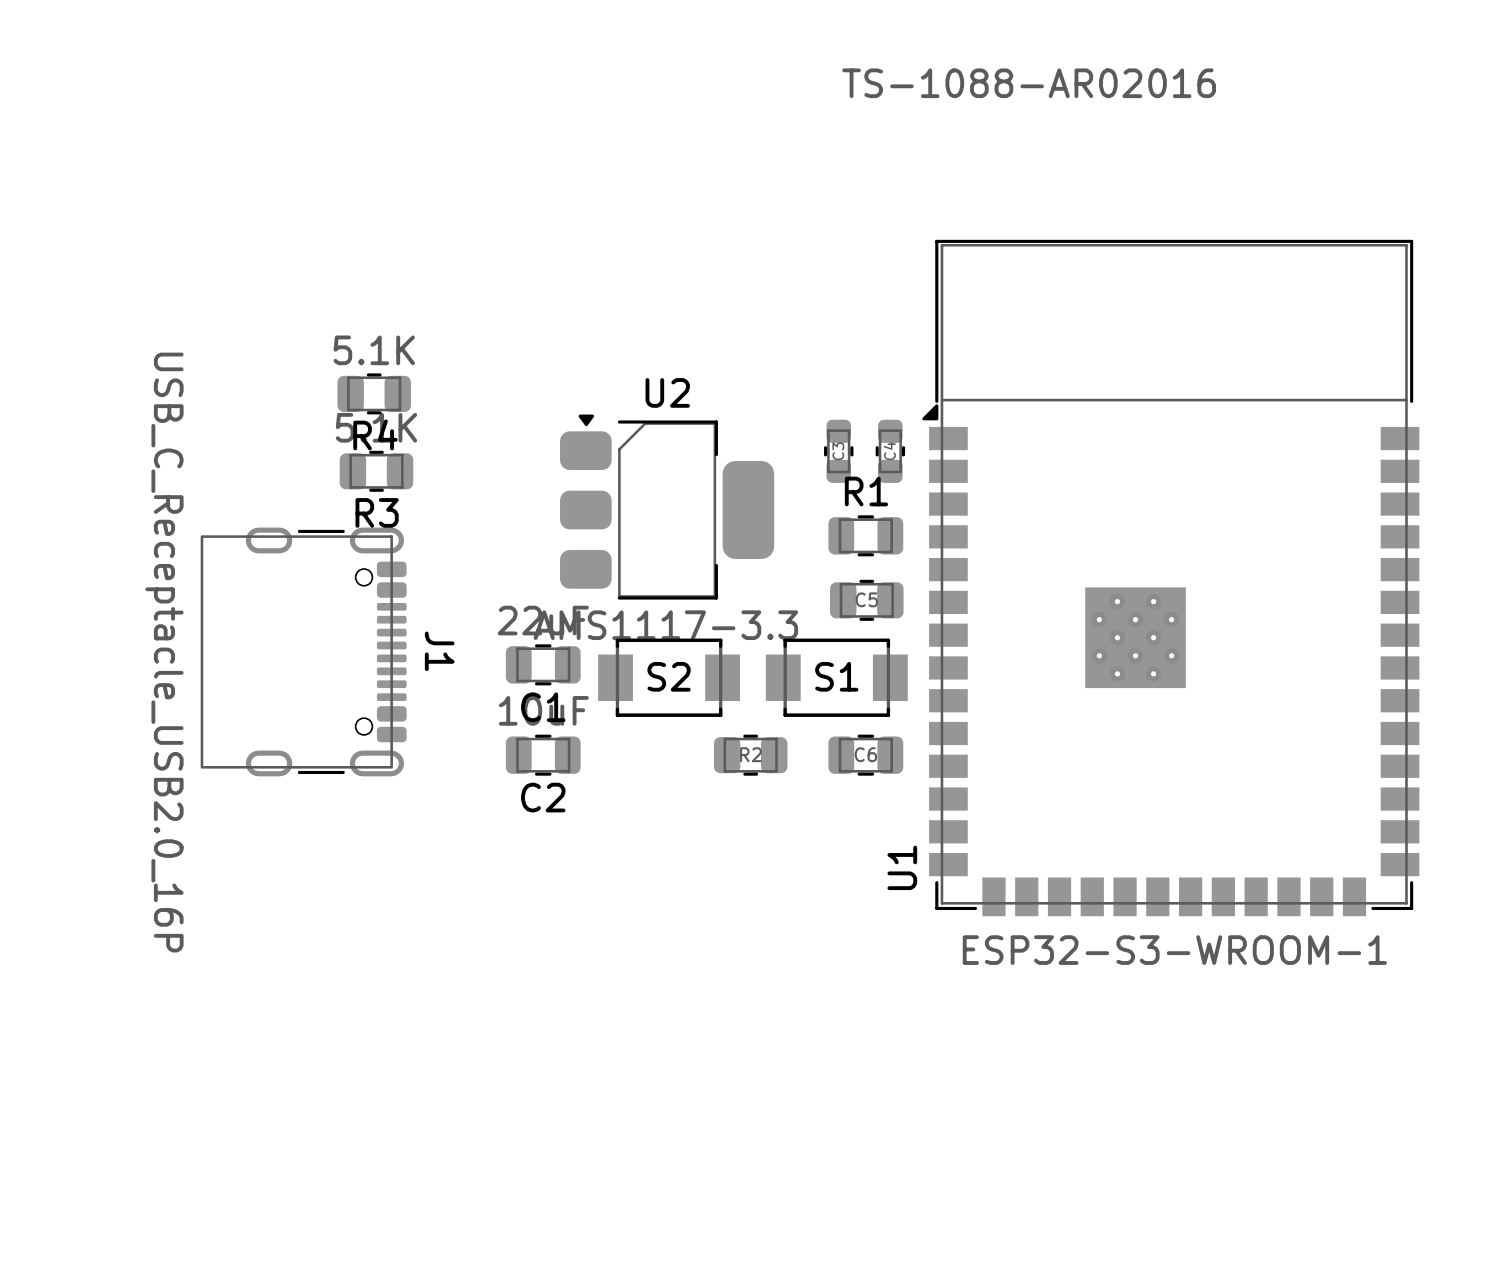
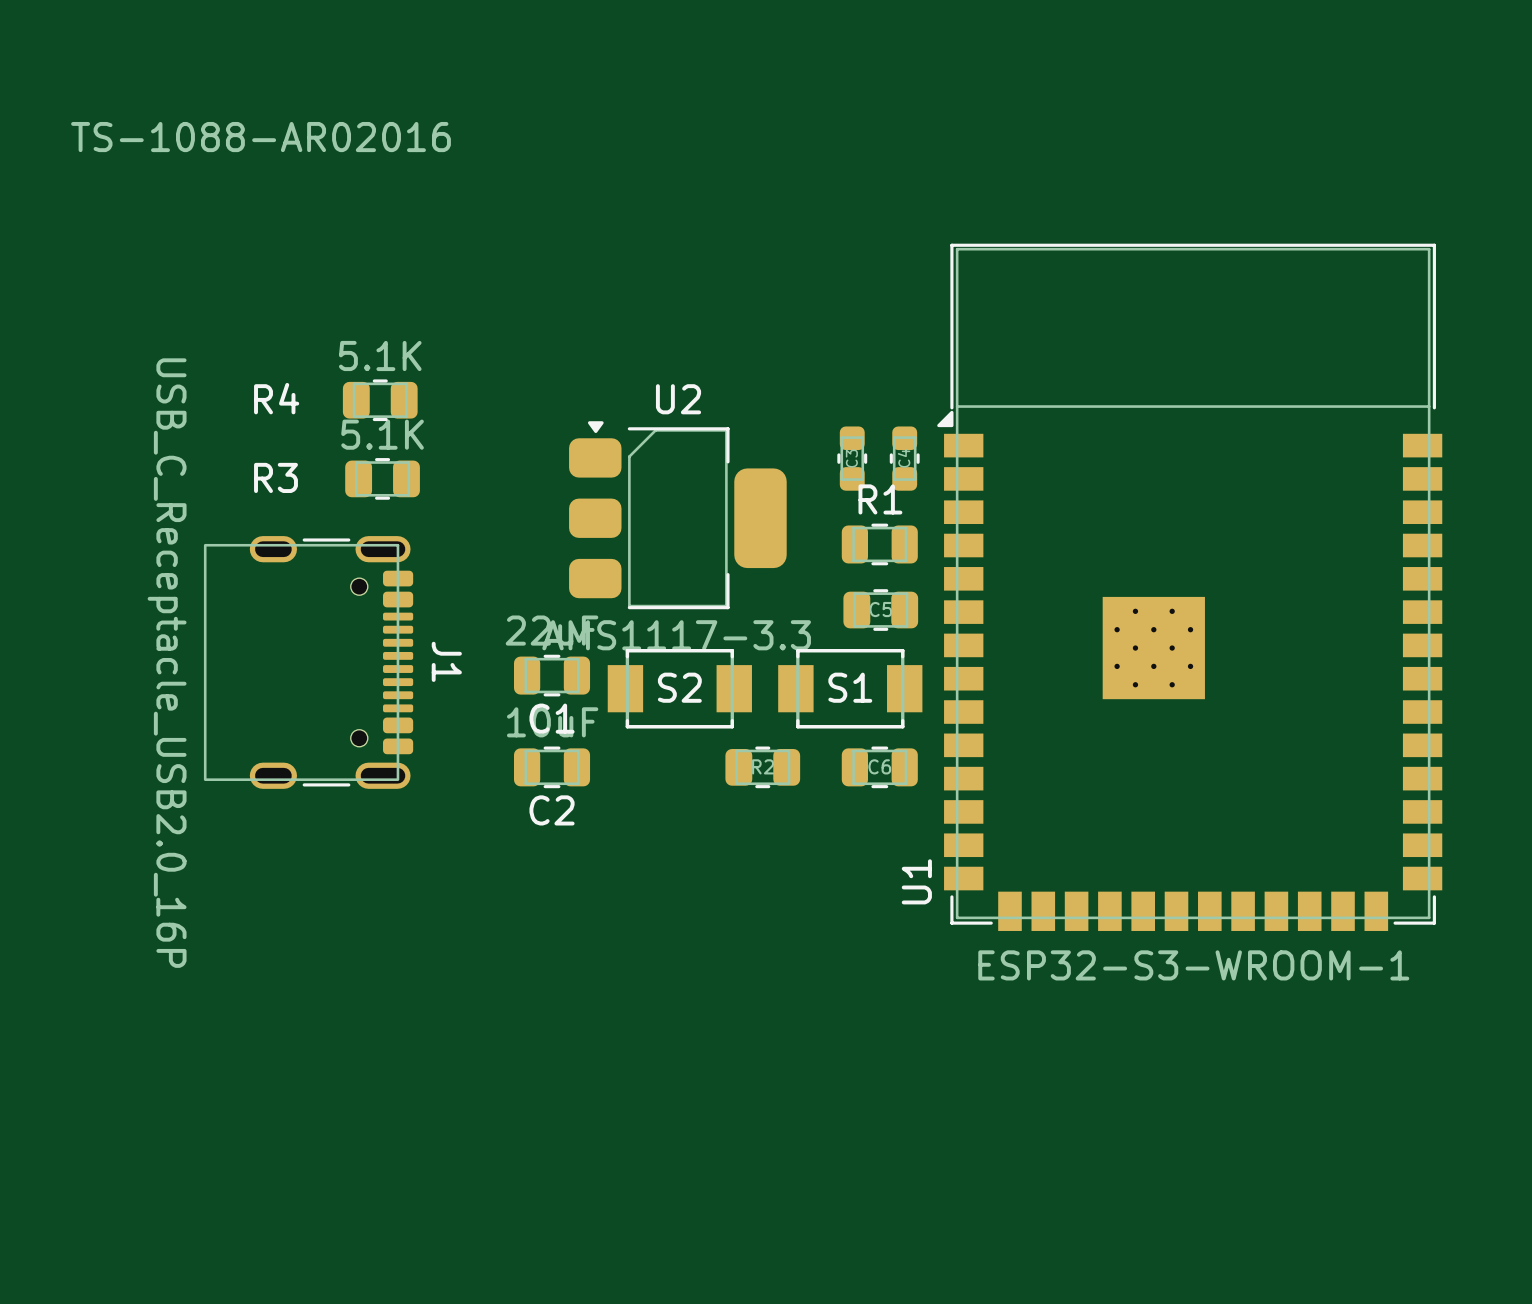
S1 value position: TS-1088-AR02016 (1029, 83) -> TS-1088-AR02016 (261, 137)
R4 name position: R4 (375, 434) -> R4 (276, 398)
R3 name position: R3 (377, 512) -> R3 (275, 477)
J1 footprint: [200, 527, 407, 777] -> [203, 536, 414, 789]

